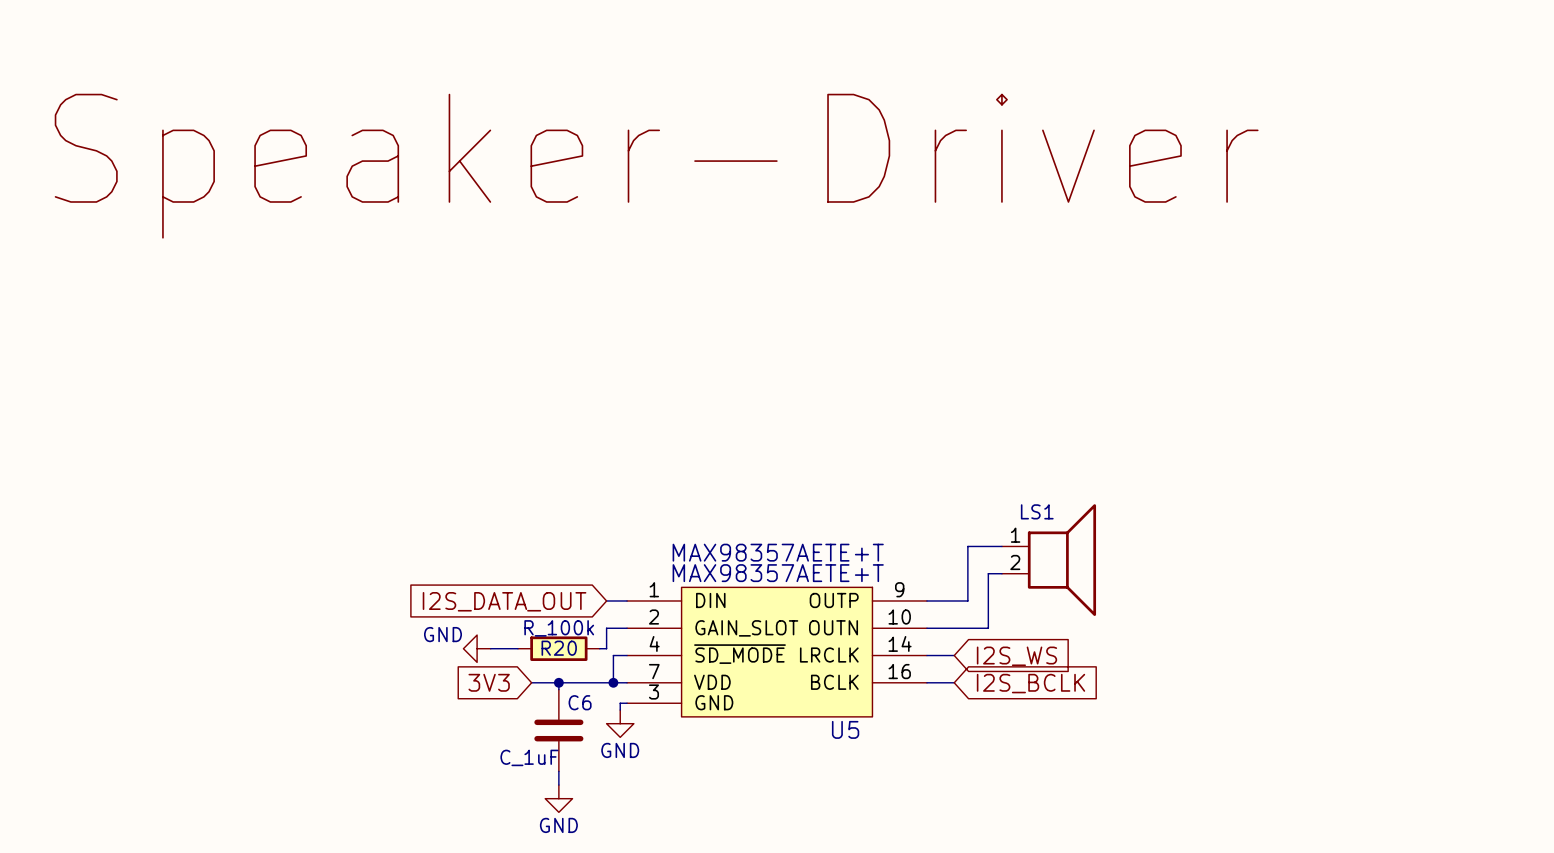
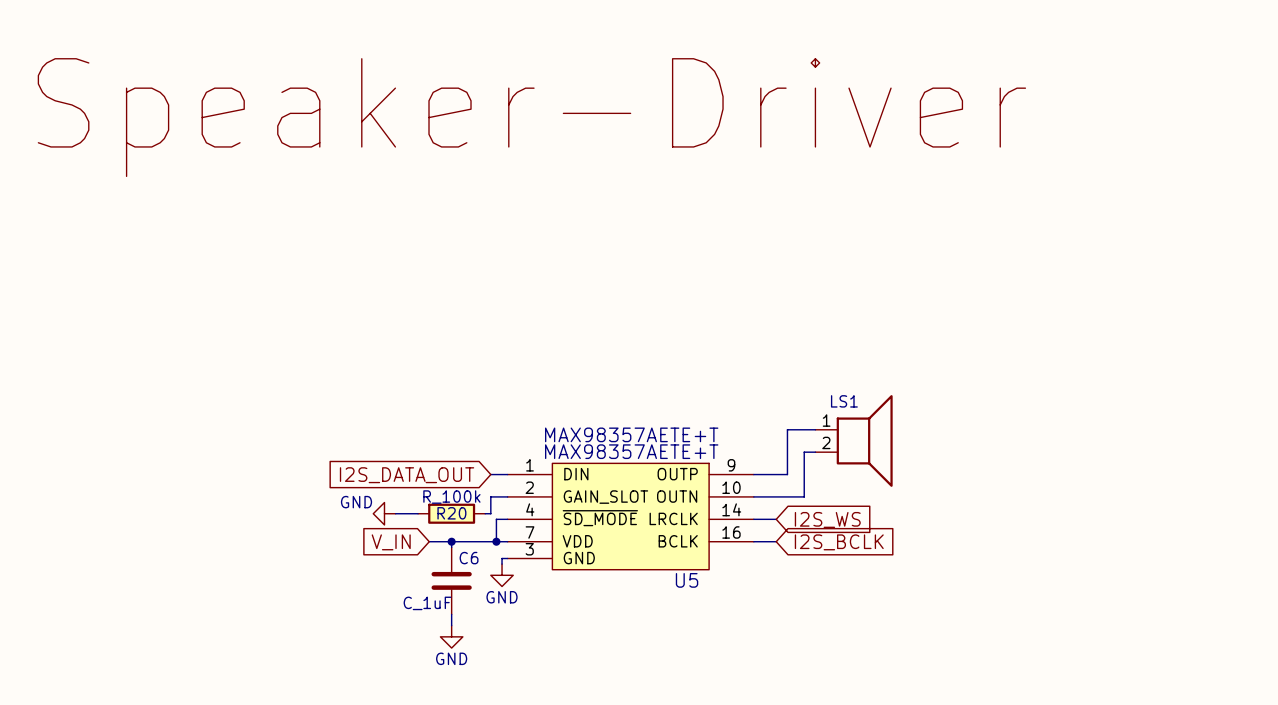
global label: 3V3 (489, 682) -> V_IN (391, 542)

